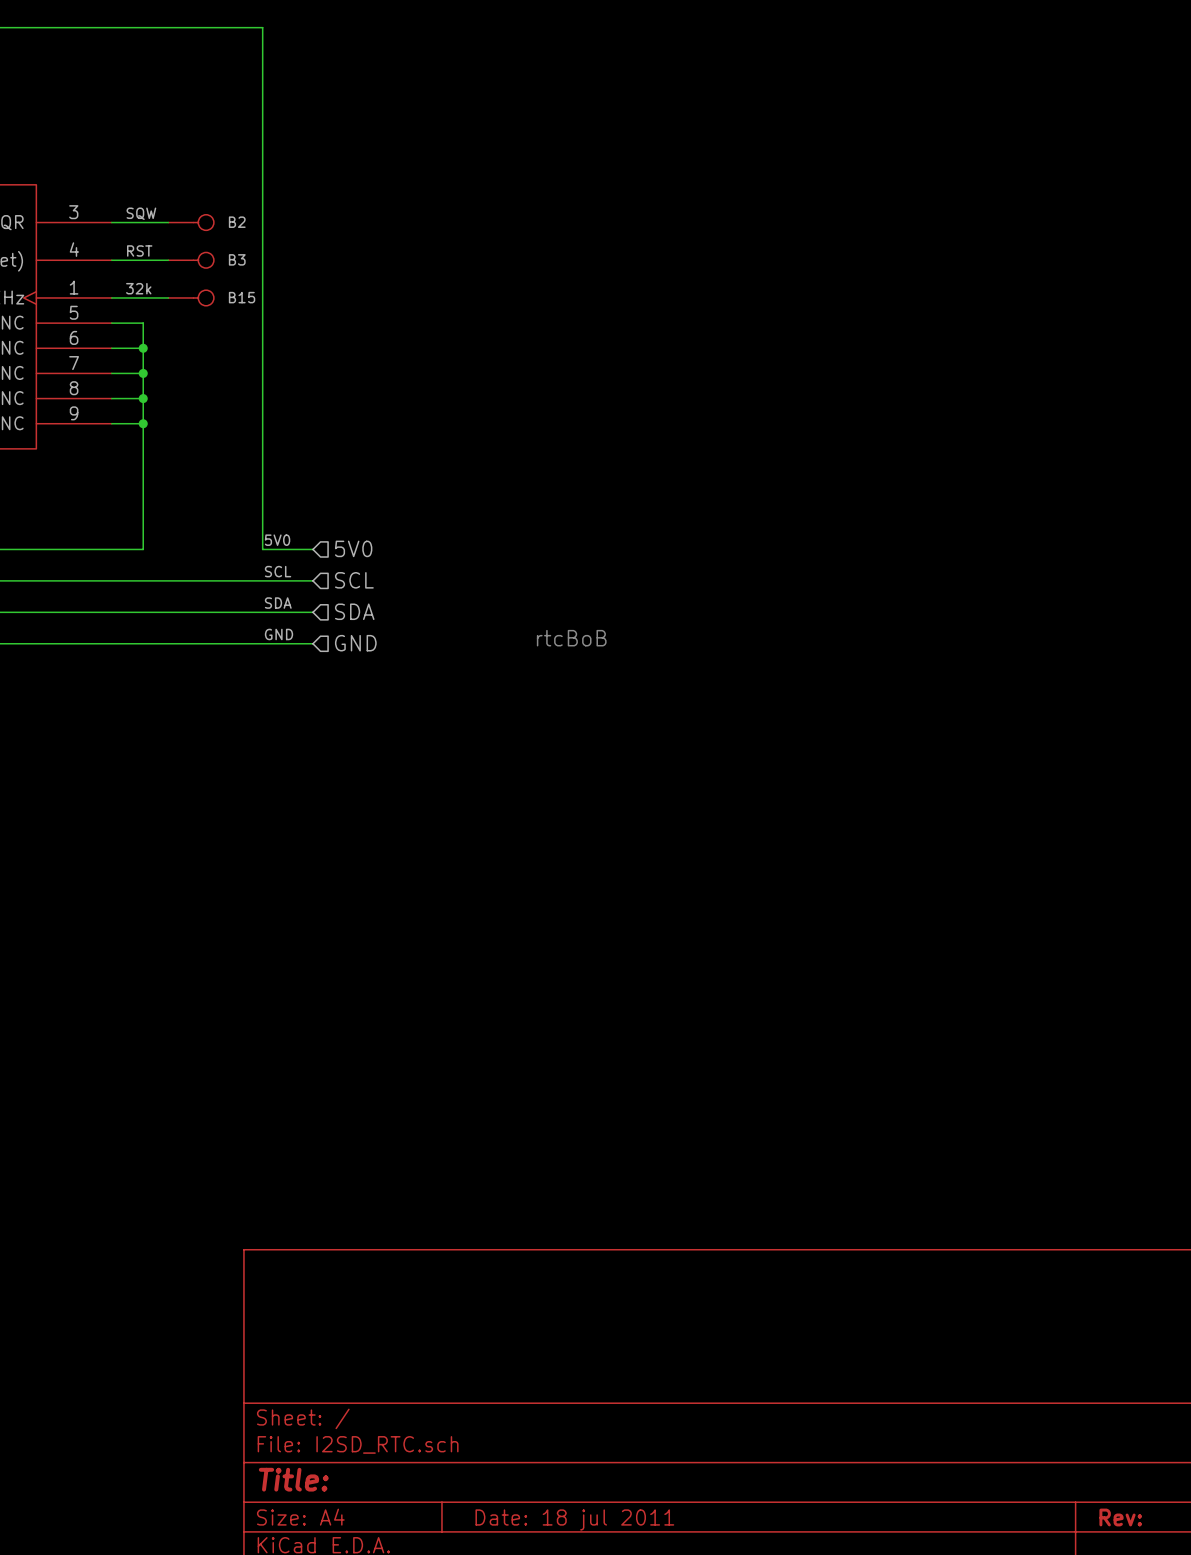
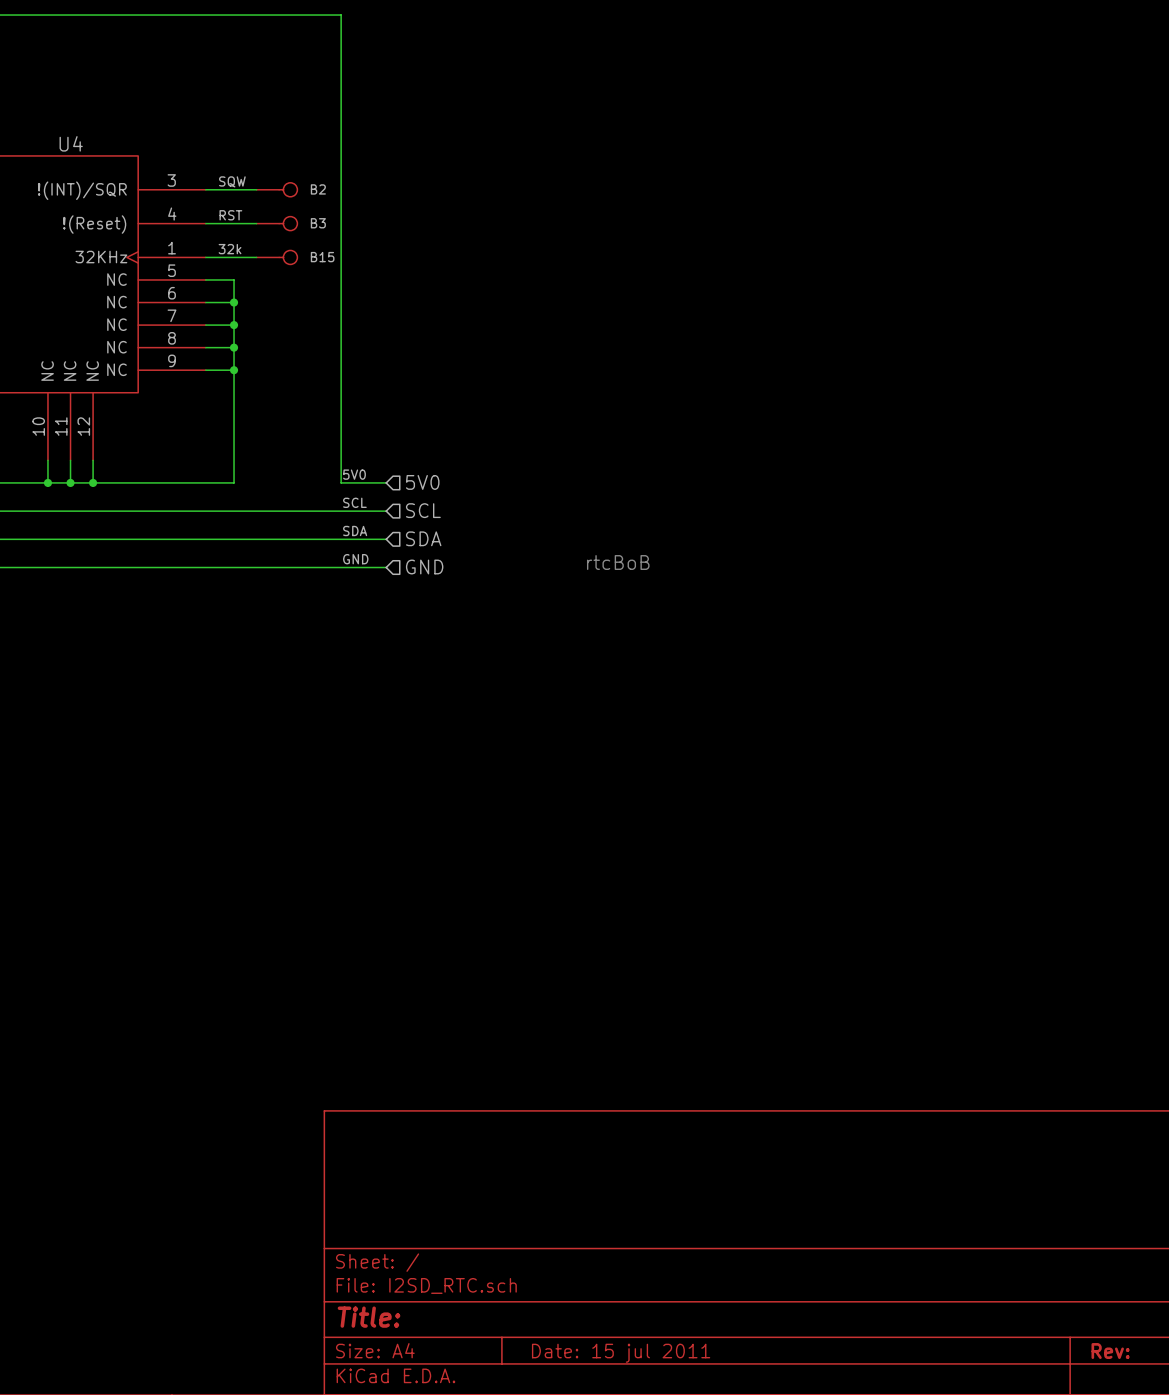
title block: Date: 18 jul 2011 (574, 1519) -> Date: 15 jul 2011 (621, 1353)

